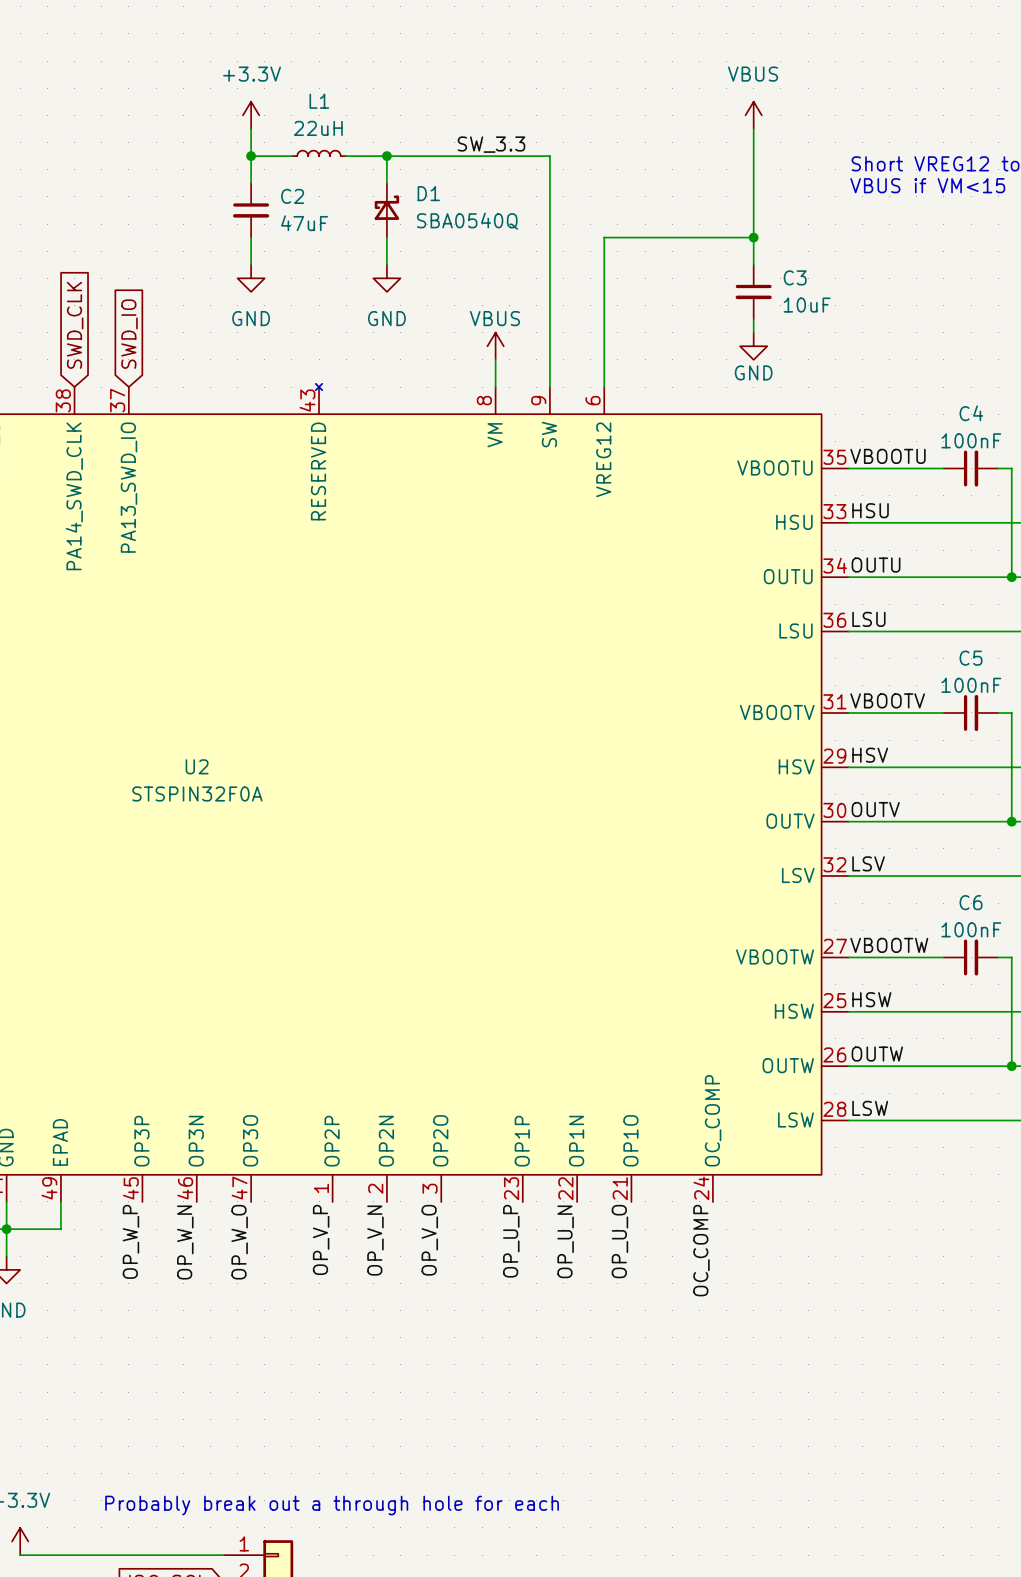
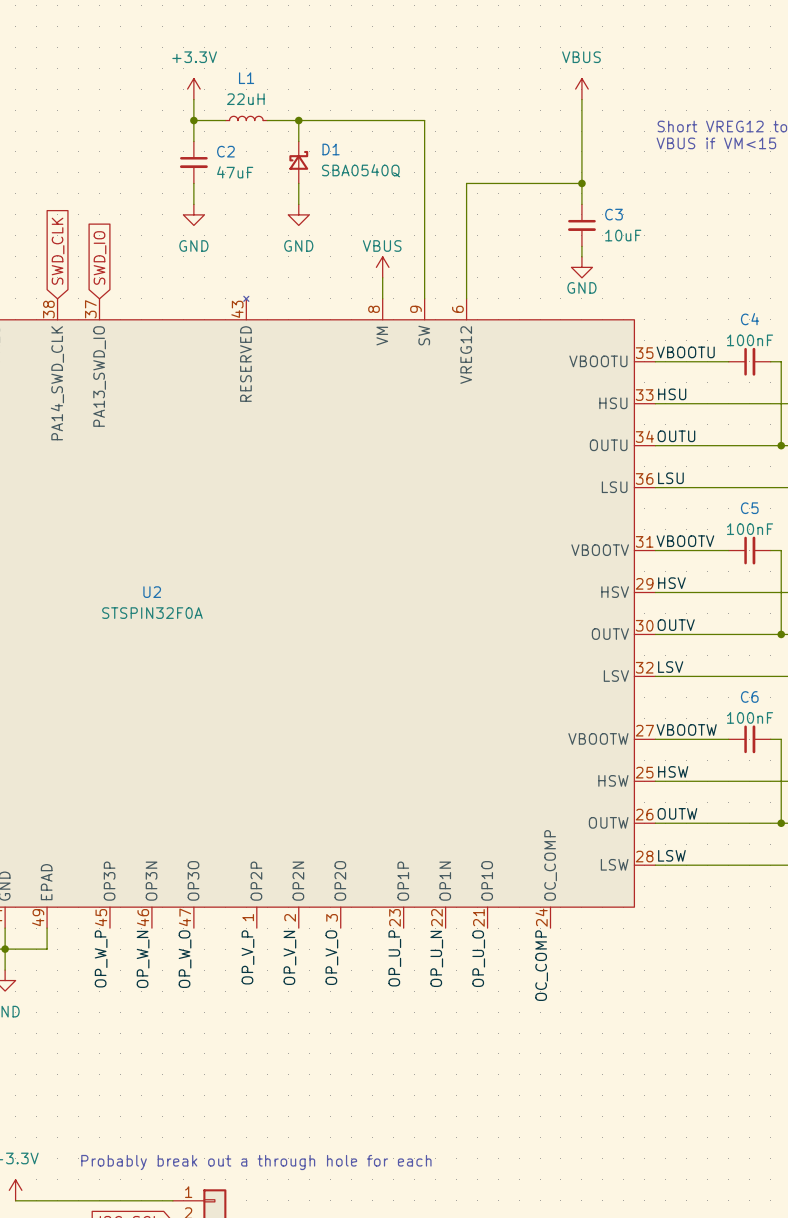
label: SW_3.3 (491, 144) -> none

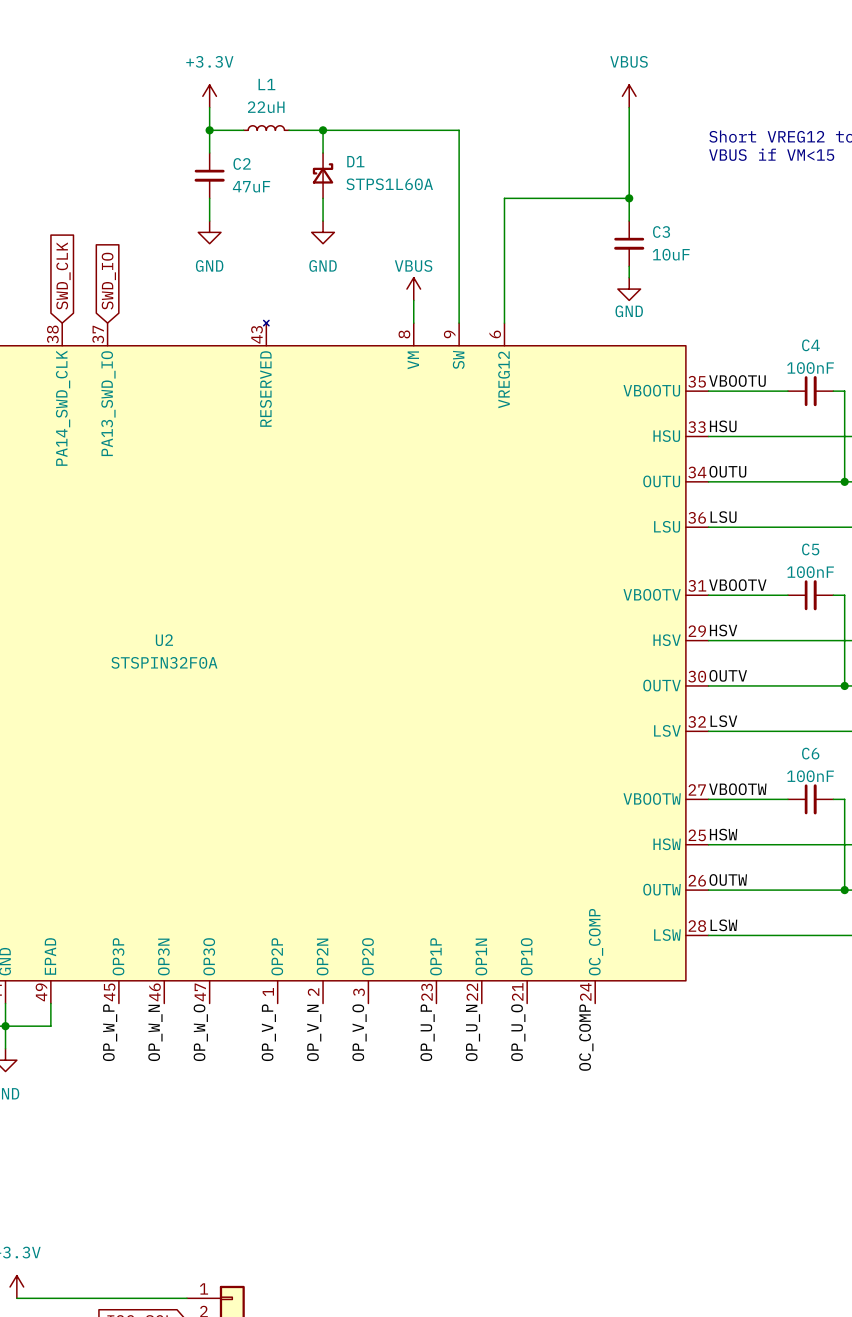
D1 value: SBA0540Q (361, 170) -> STPS1L60A (389, 184)
text: Probably break out a through hole for each (256, 1162) -> none

